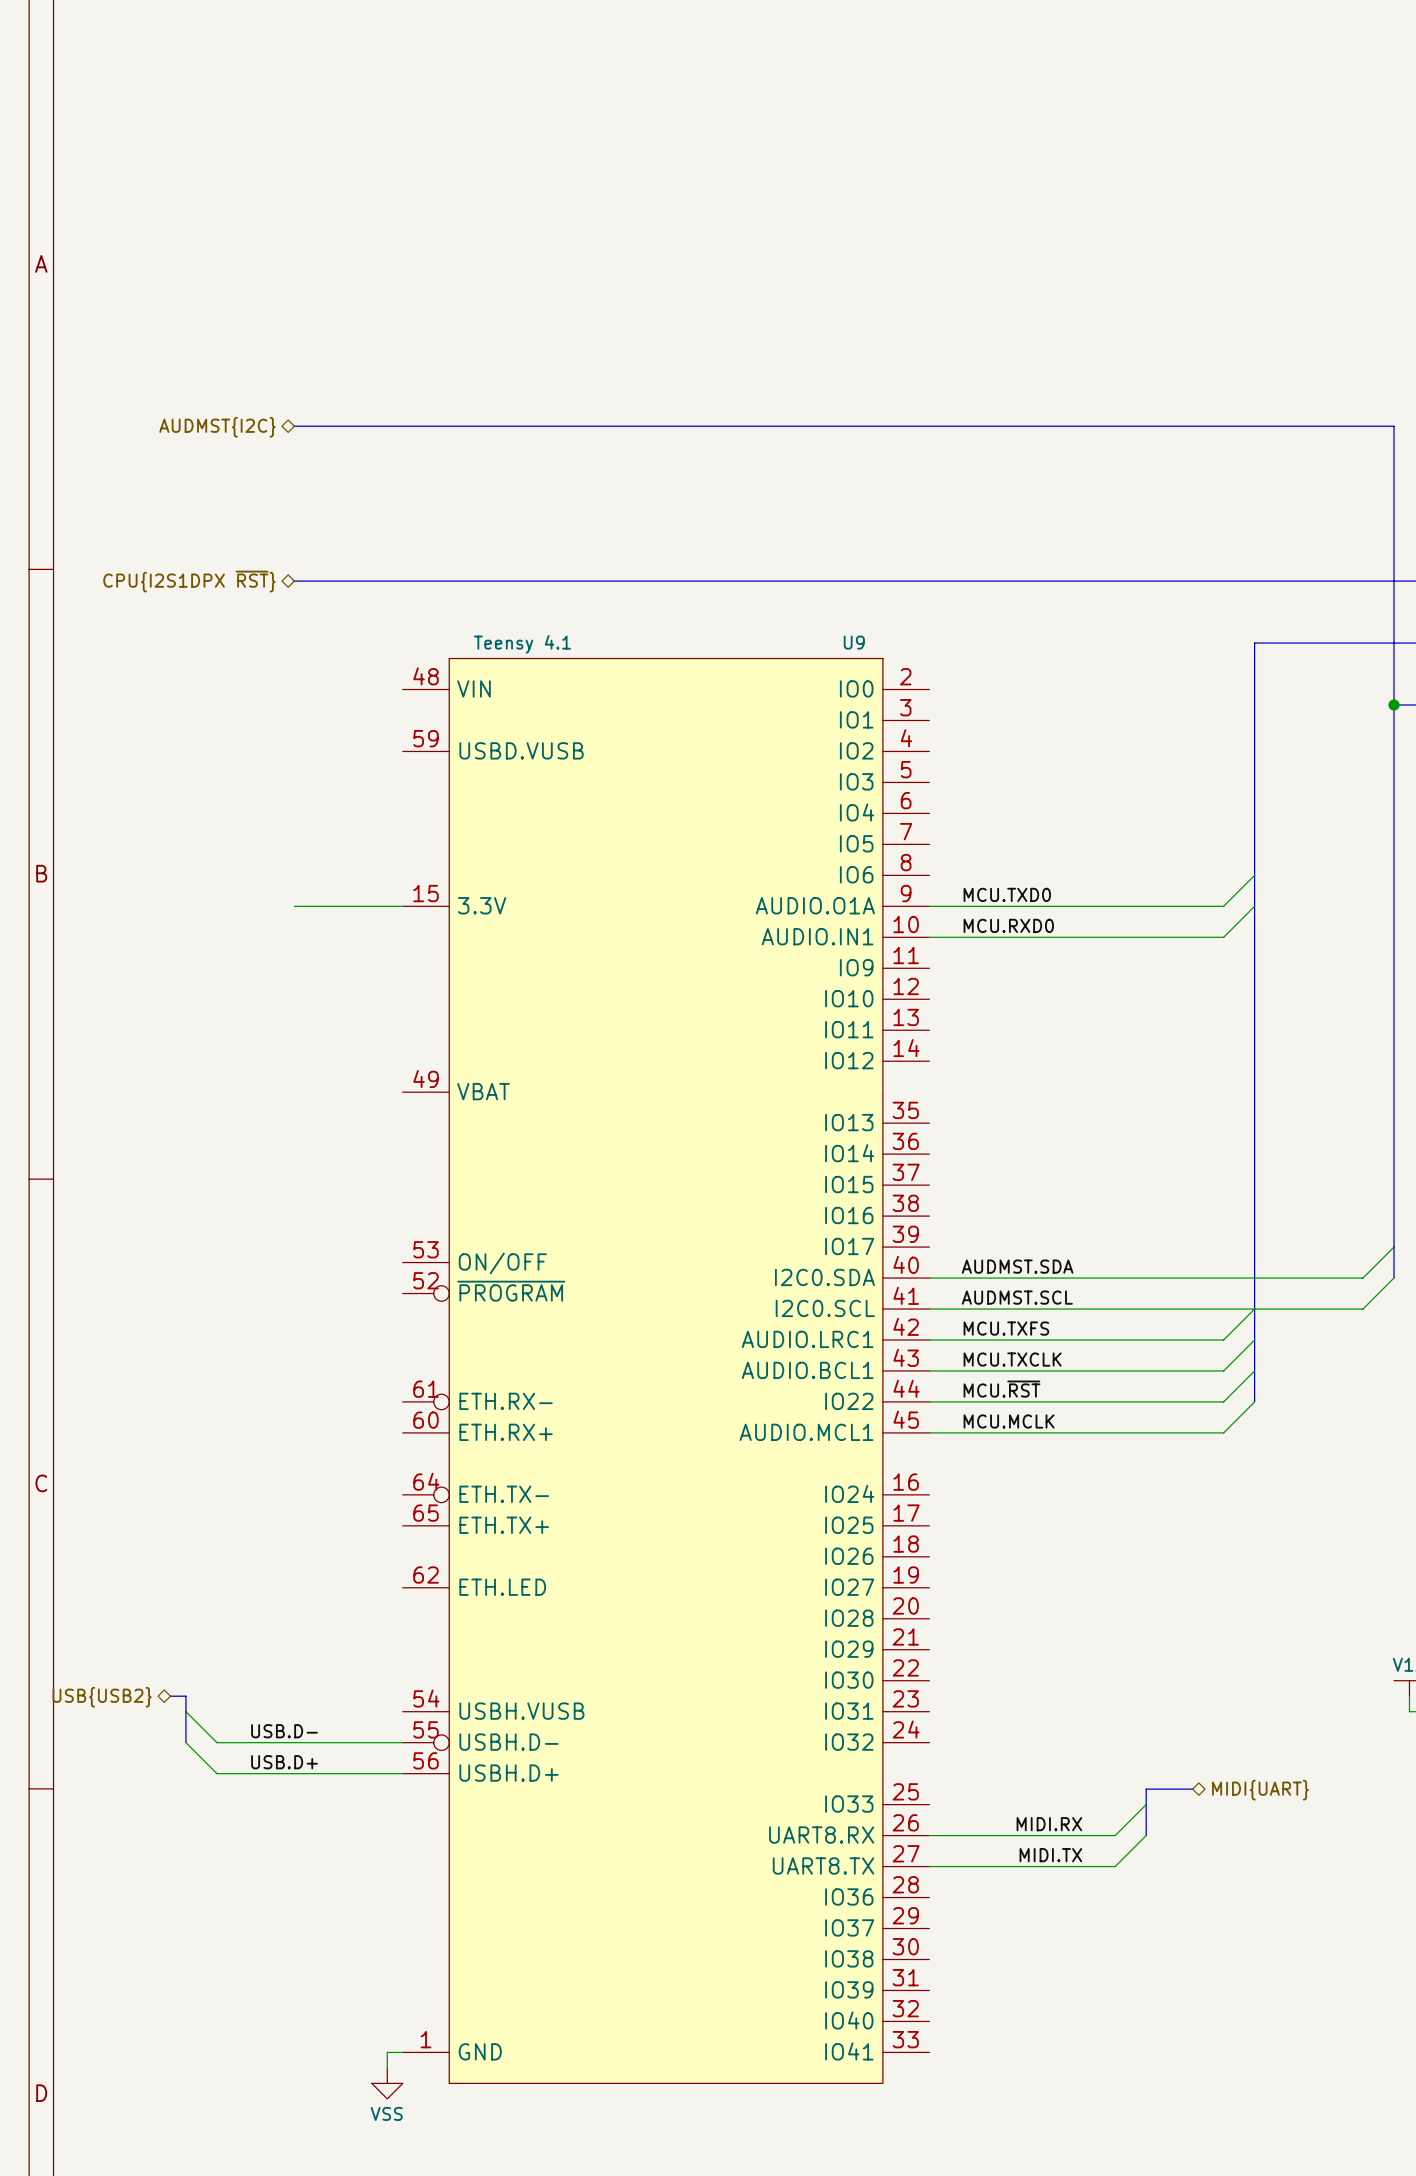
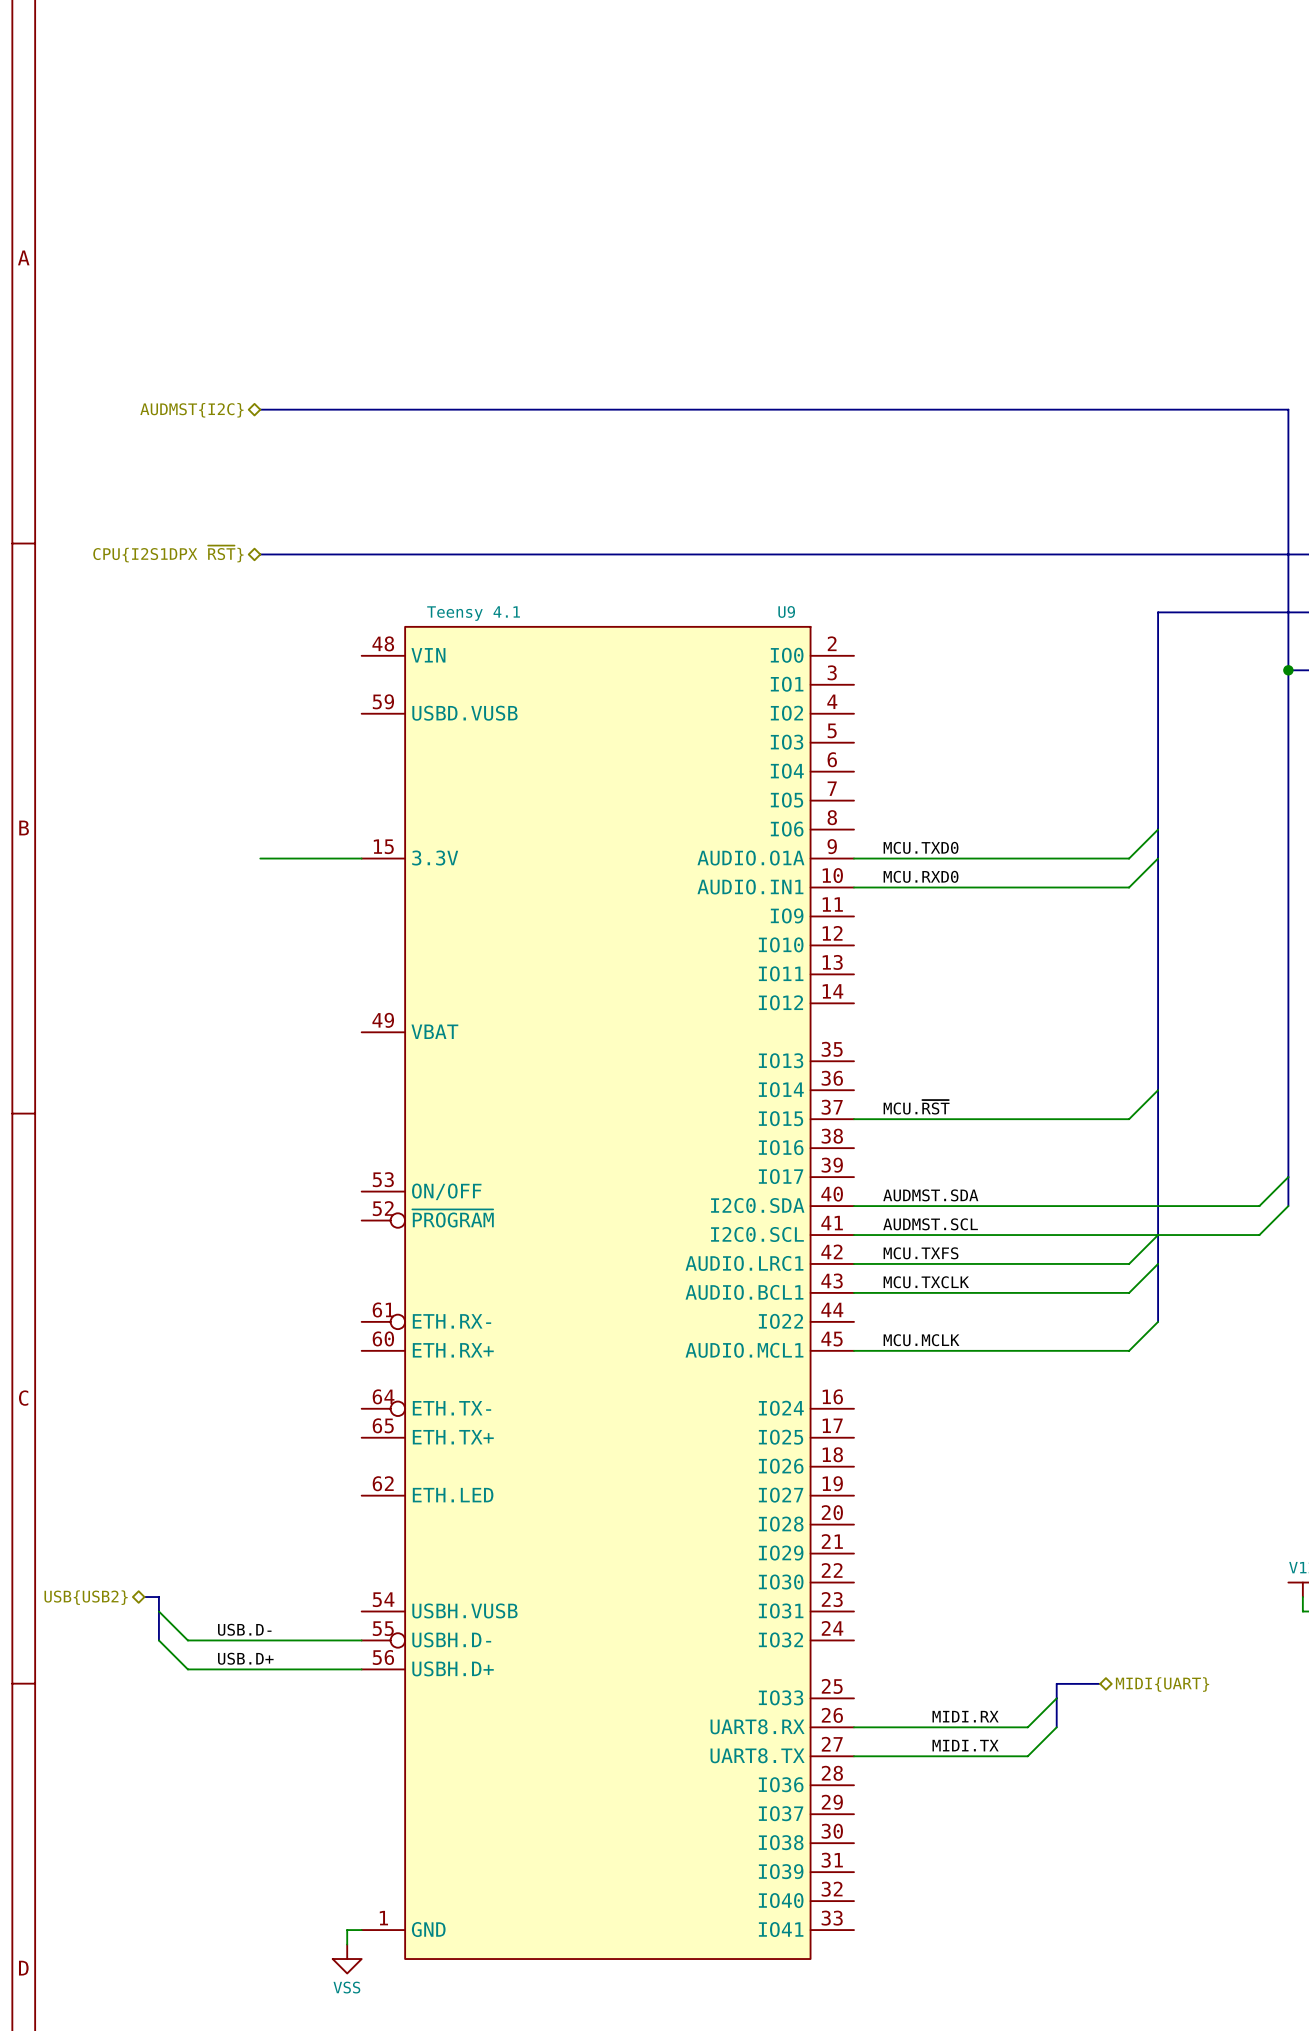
wire: (1254, 1370) (1223, 1401) (929, 1401) -> (1158, 1090) (1129, 1119) (853, 1119)
label position: MCU.~{RST} (1001, 1389) -> MCU.~{RST} (916, 1107)

